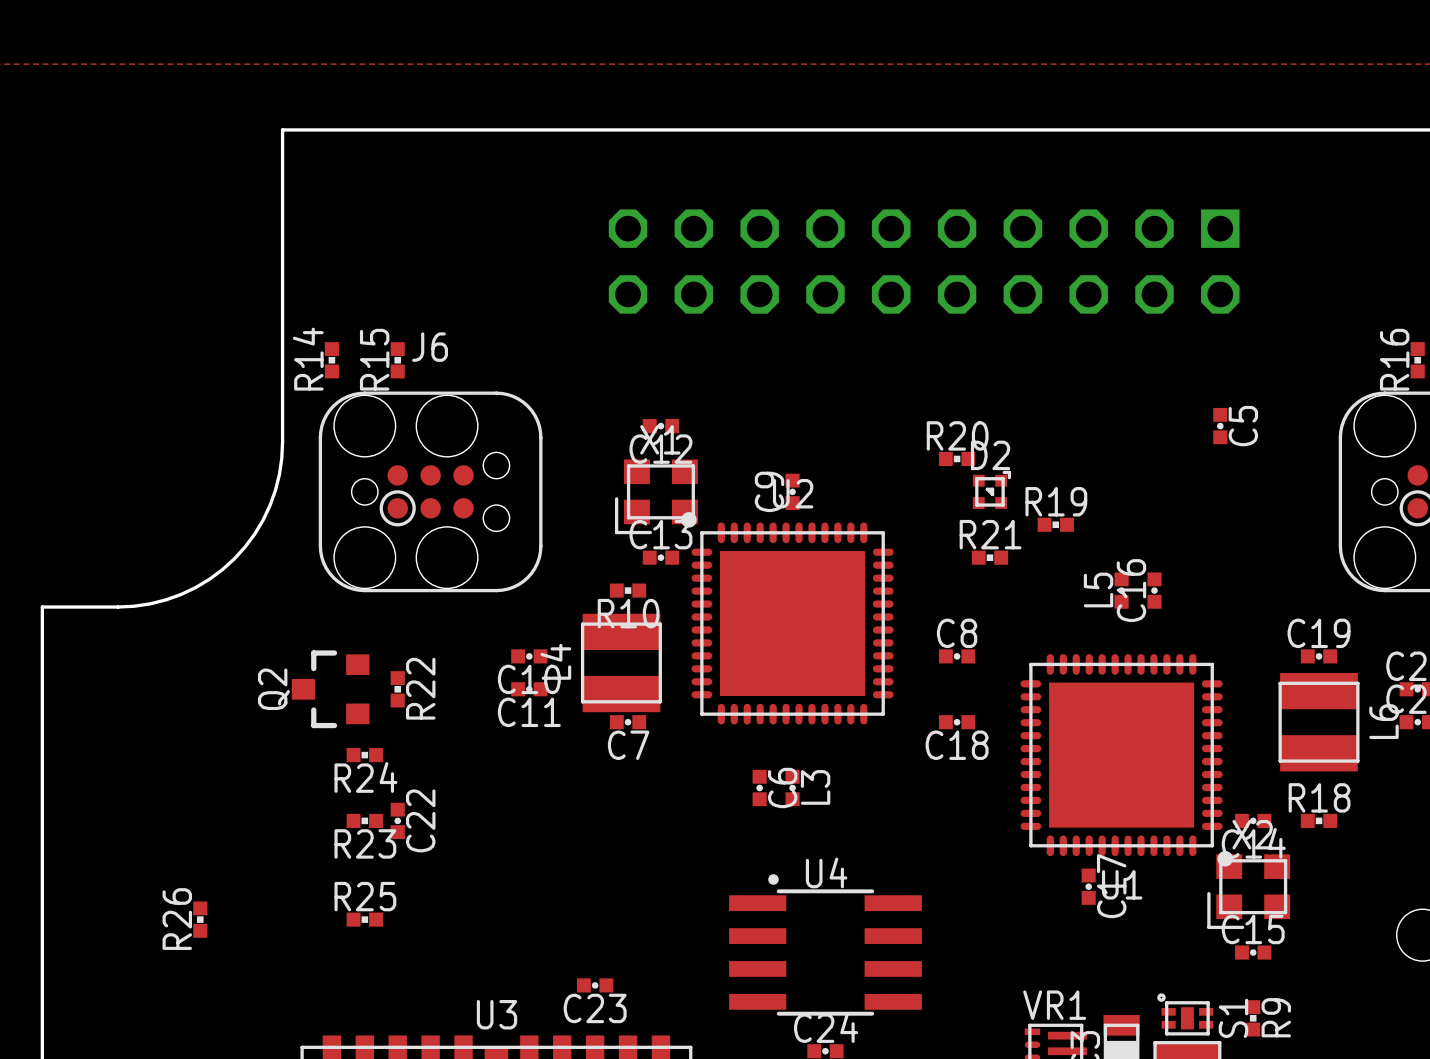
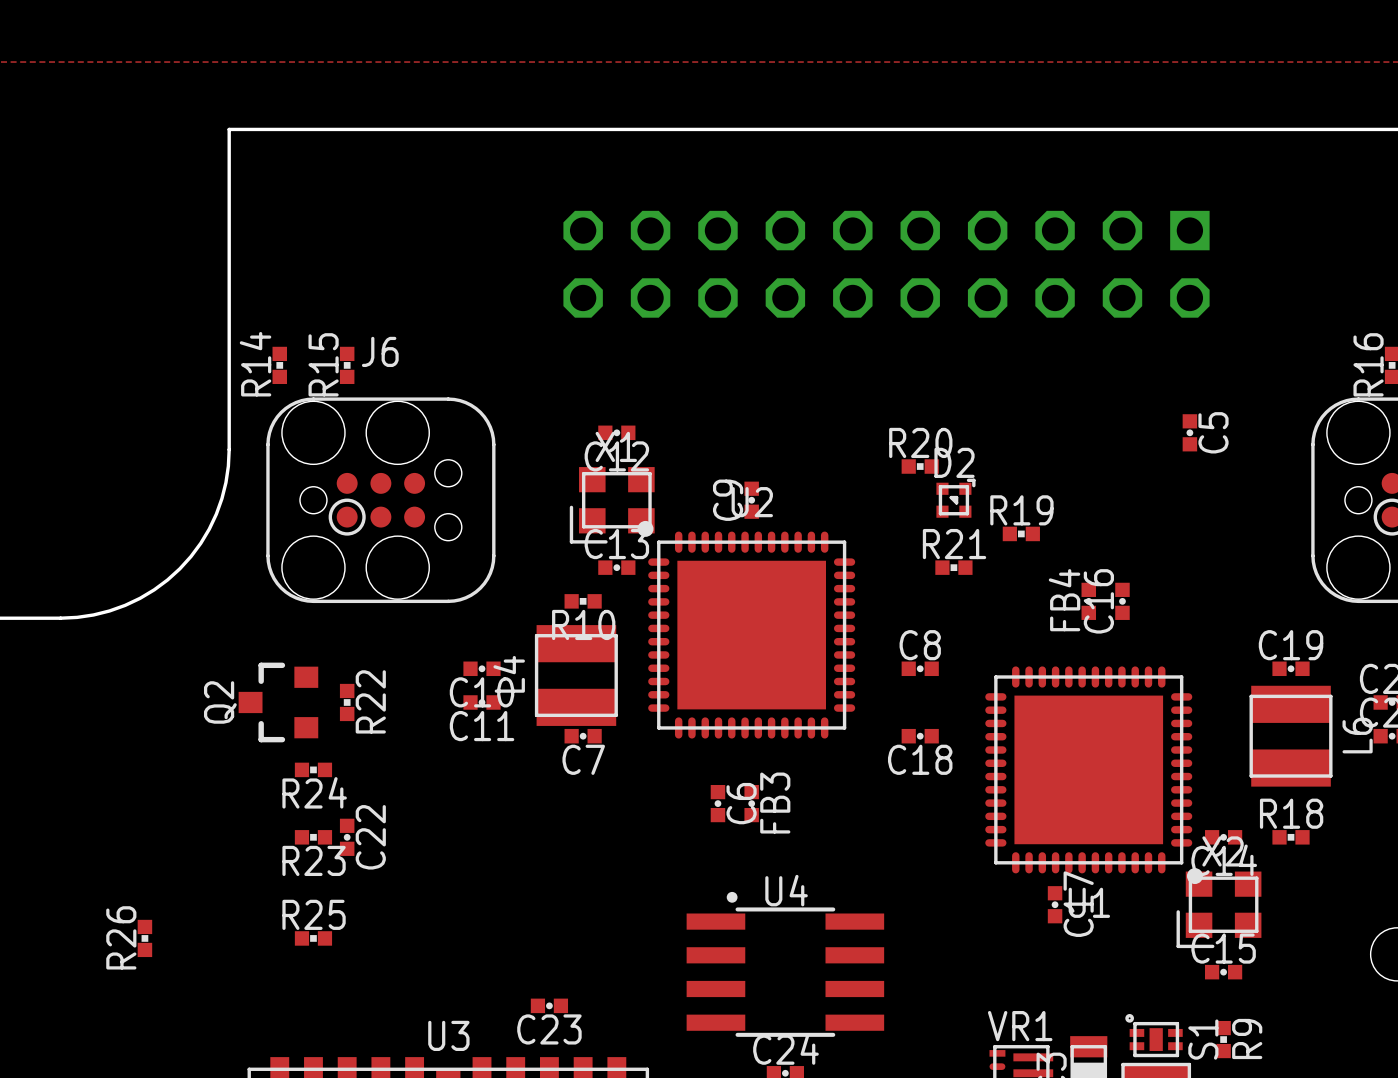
L5 name: L5 (1098, 590) -> FB4 (1064, 600)
L3 name: L3 (815, 787) -> FB3 (775, 803)

